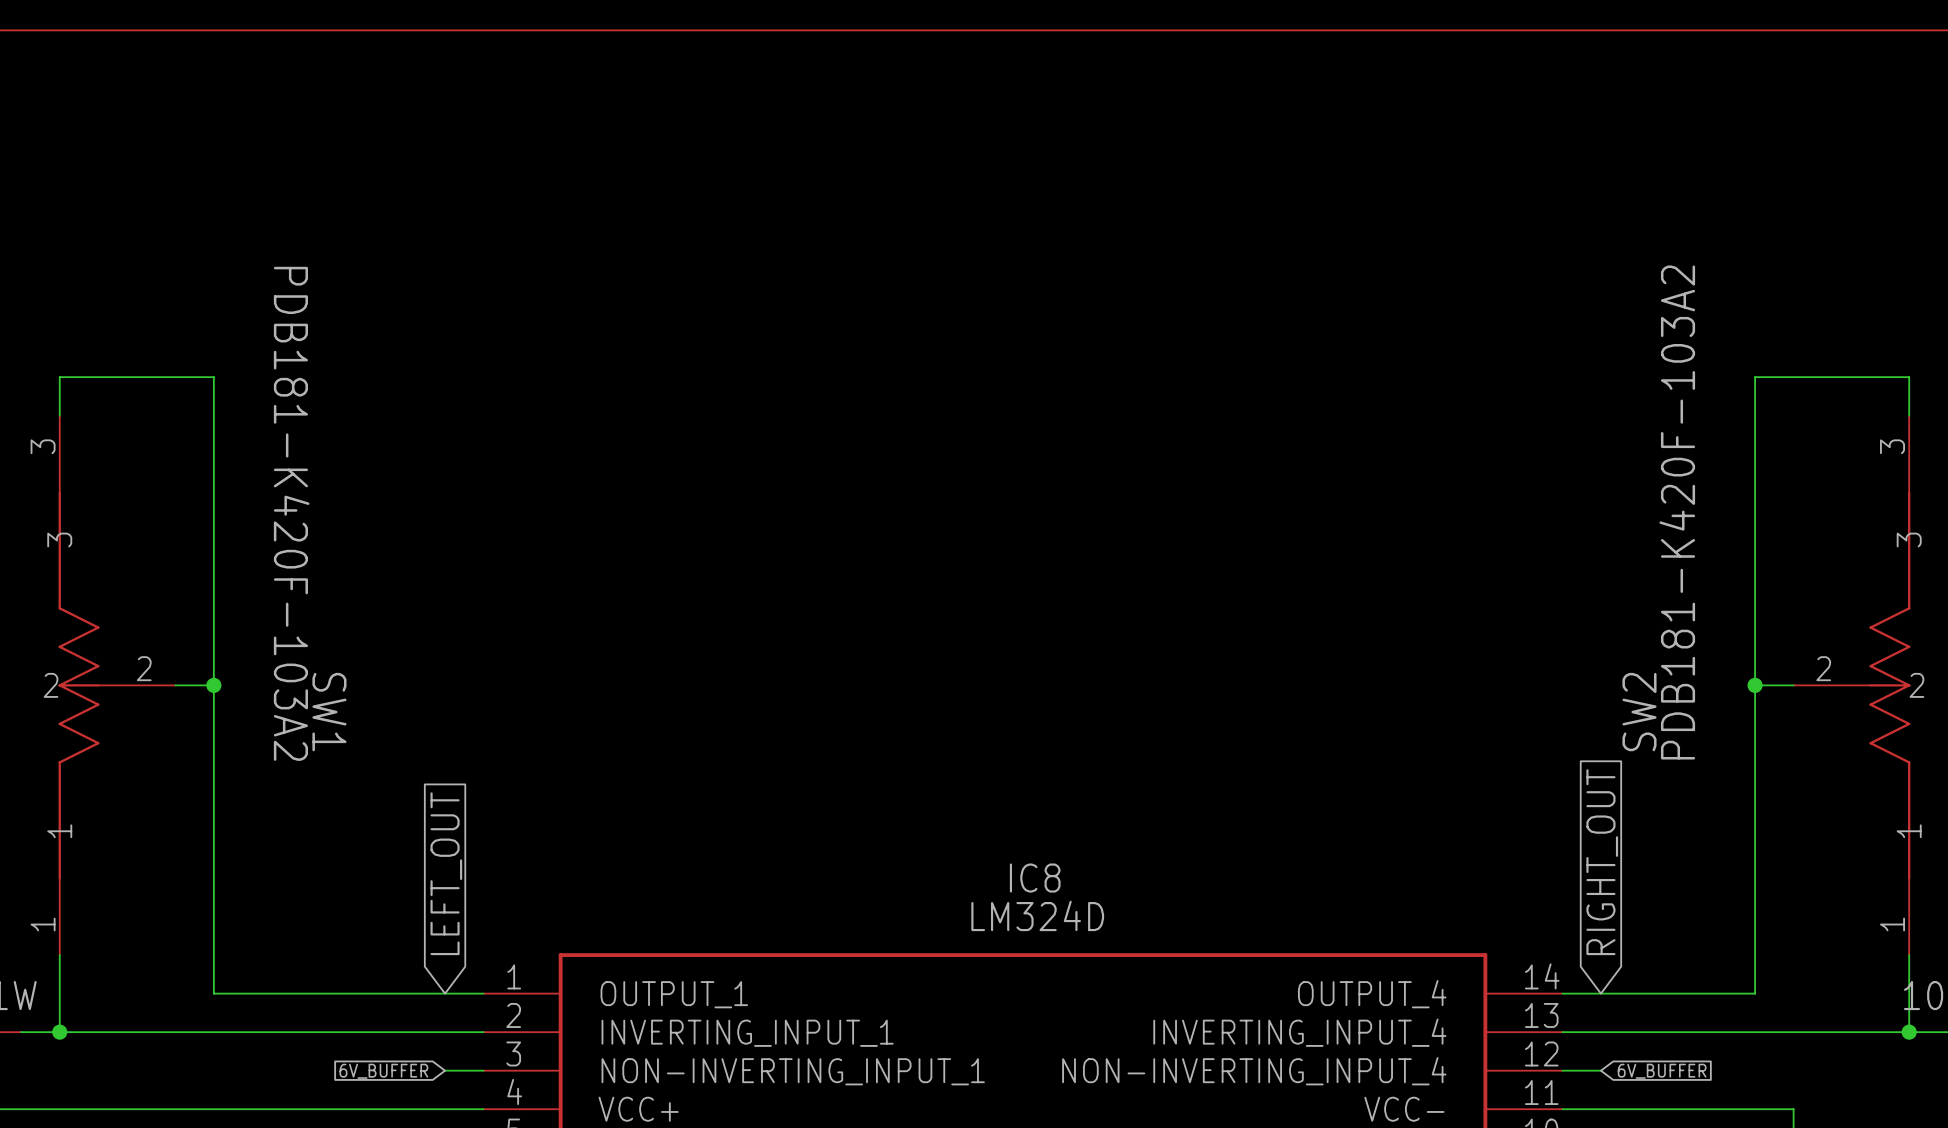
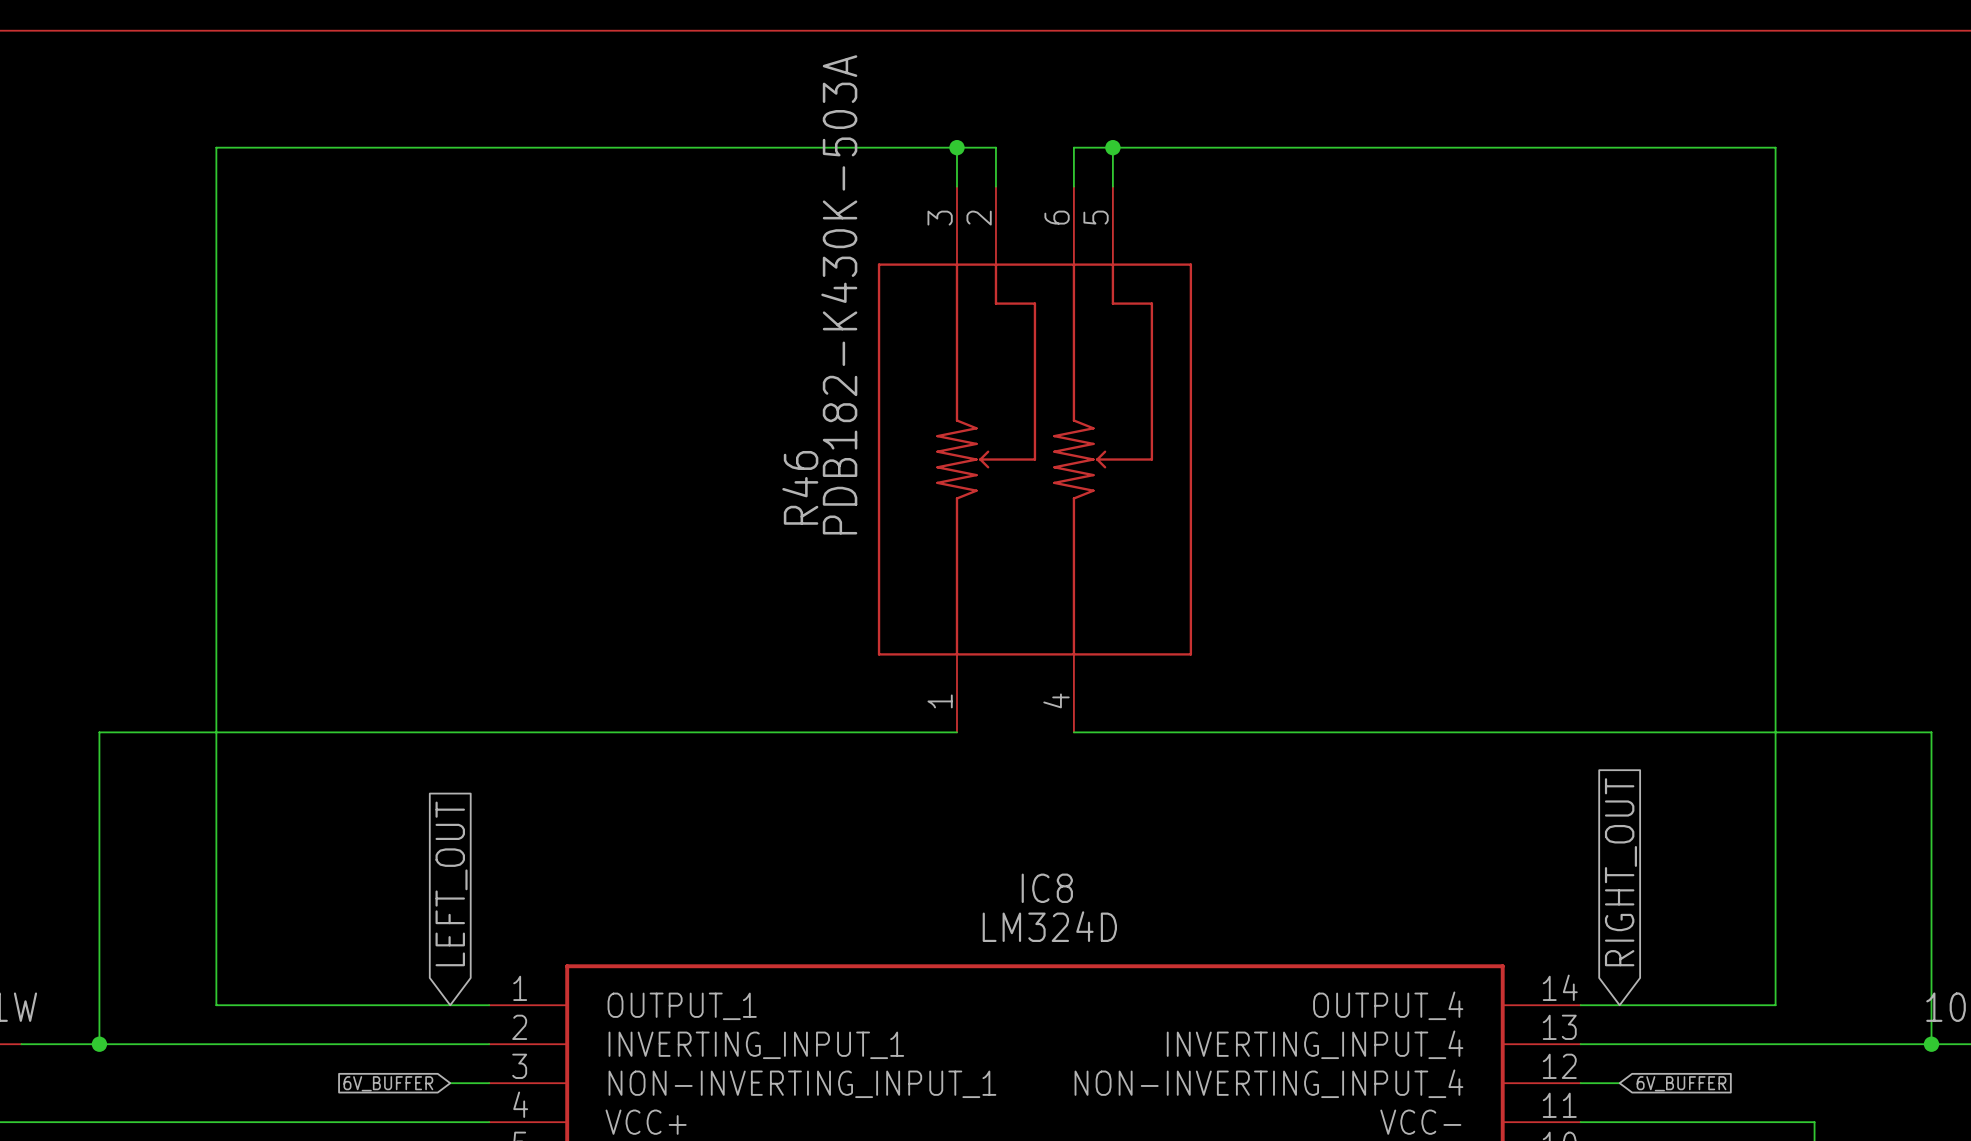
wire: none -> (956, 147) (956, 186)
junction: none -> (956, 147)
wire: none -> (1112, 147) (1112, 186)
junction: none -> (1112, 147)
wire: (213, 377) (59, 377) (59, 415) -> (216, 381) (216, 147) (995, 147) (995, 186)
wire: (1755, 377) (1909, 377) (1909, 415) -> (1775, 381) (1775, 147) (1073, 147) (1073, 186)
R46: none -> PDB182-K430K-503A (1034, 459)
SW1: PDB181-K420F-103A2 (116, 685) -> none
wire: (175, 685) (213, 685) -> none
junction: (213, 685) -> none
wire: (1755, 685) (1793, 685) -> none
junction: (1755, 685) -> none
SW2: PDB181-K420F-103A2 (1851, 685) -> none
wire: none -> (956, 732) (99, 732) (99, 1044)
wire: none -> (1073, 732) (1931, 732) (1931, 966)
wire: (59, 955) (59, 1032) -> none
junction position: (59, 1032) -> (99, 1044)

